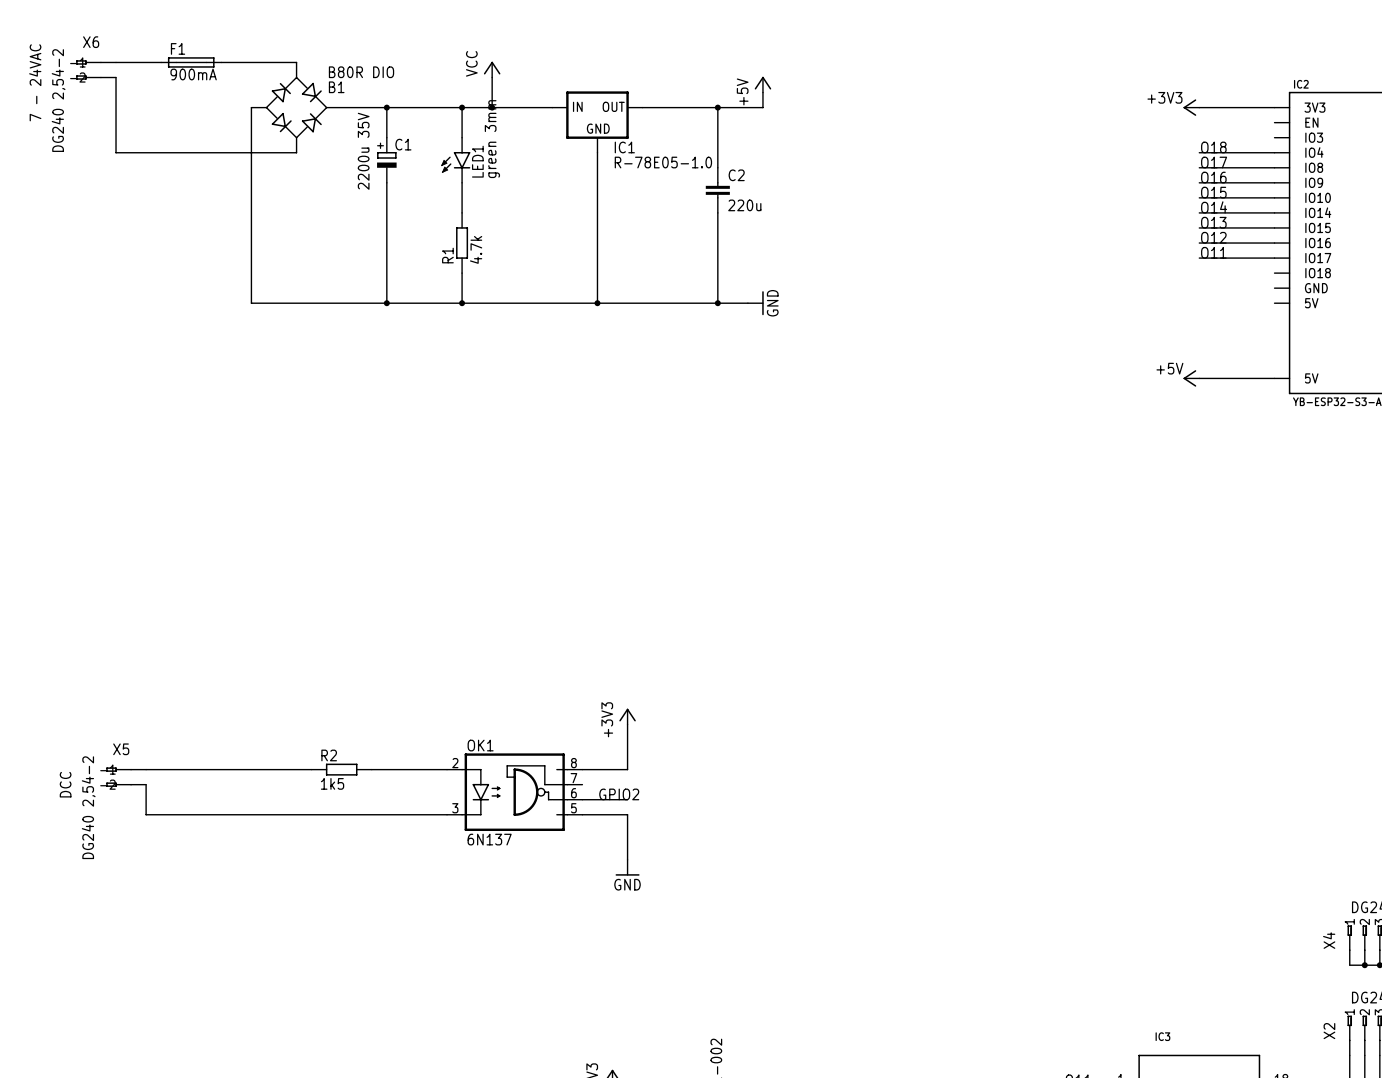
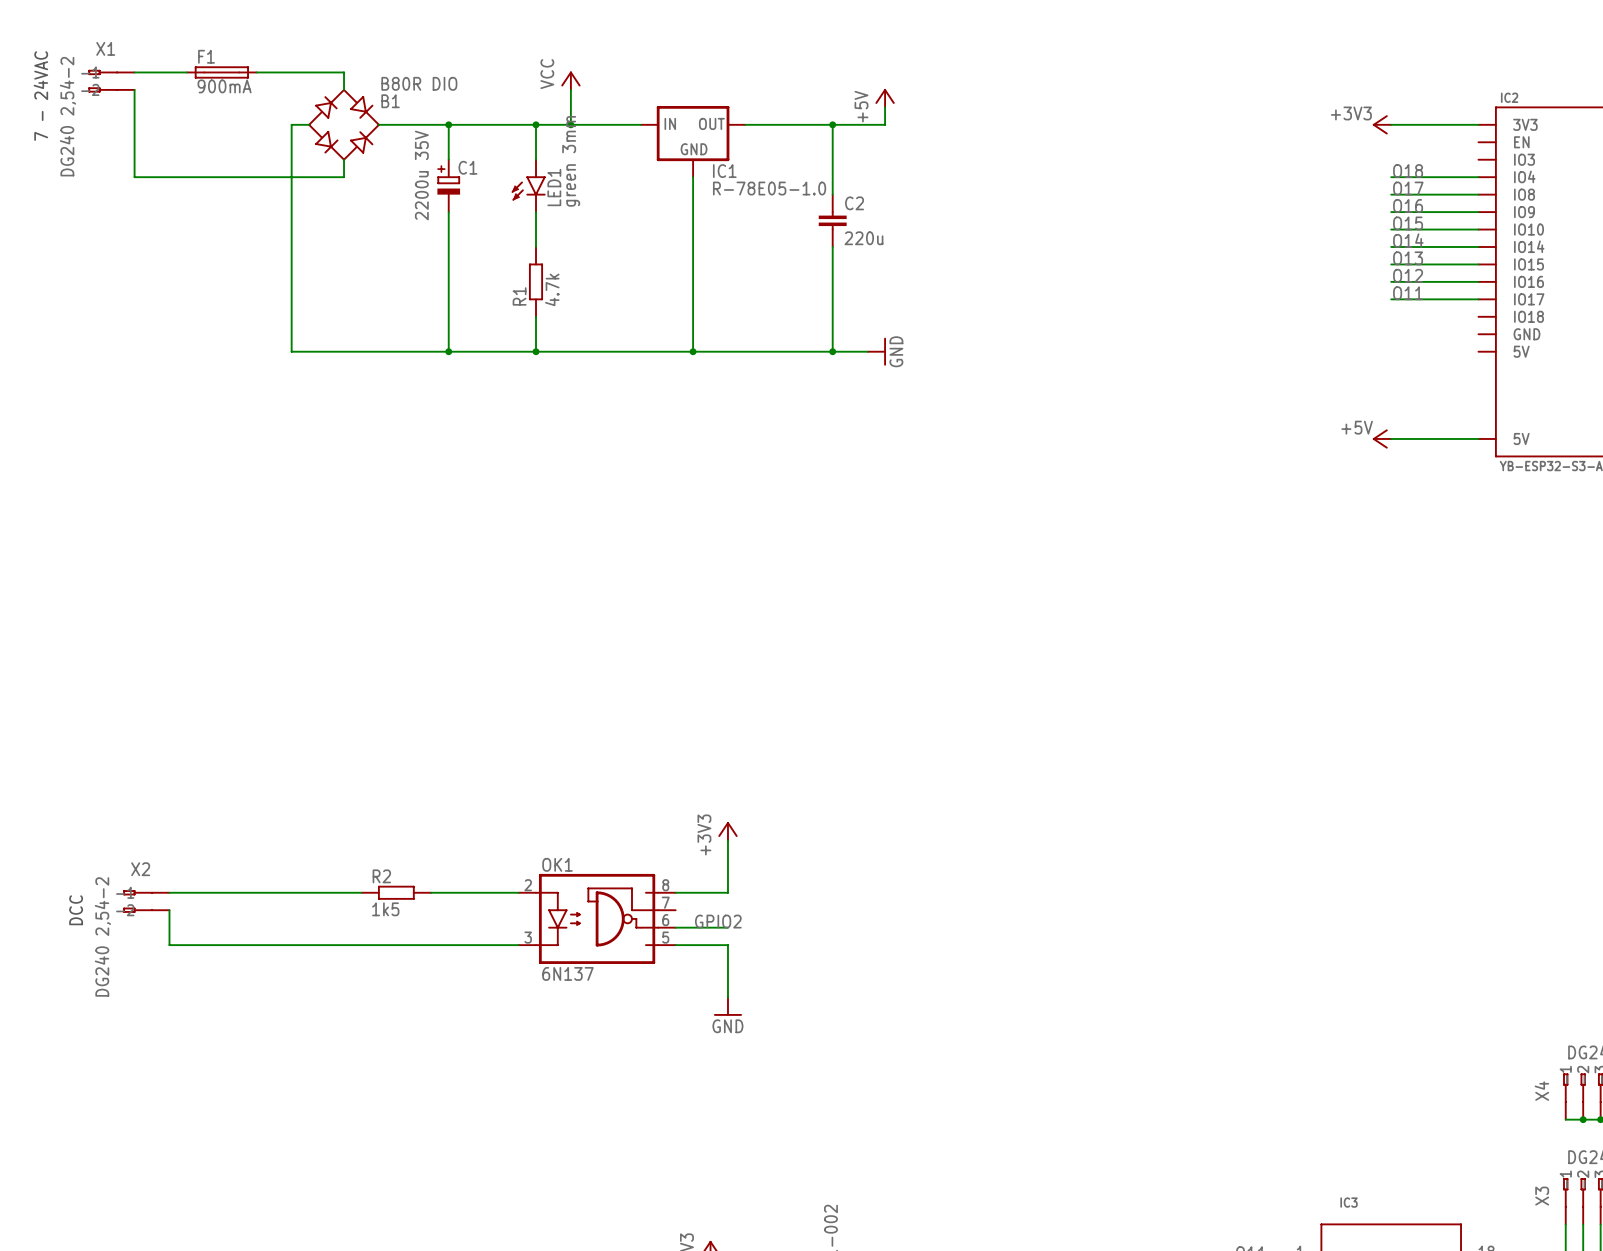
X6 name: X6 (91, 42) -> X1 (105, 48)
X5 name: X5 (121, 749) -> X2 (140, 869)
X2 name: X2 (1329, 1031) -> X3 (1542, 1196)

